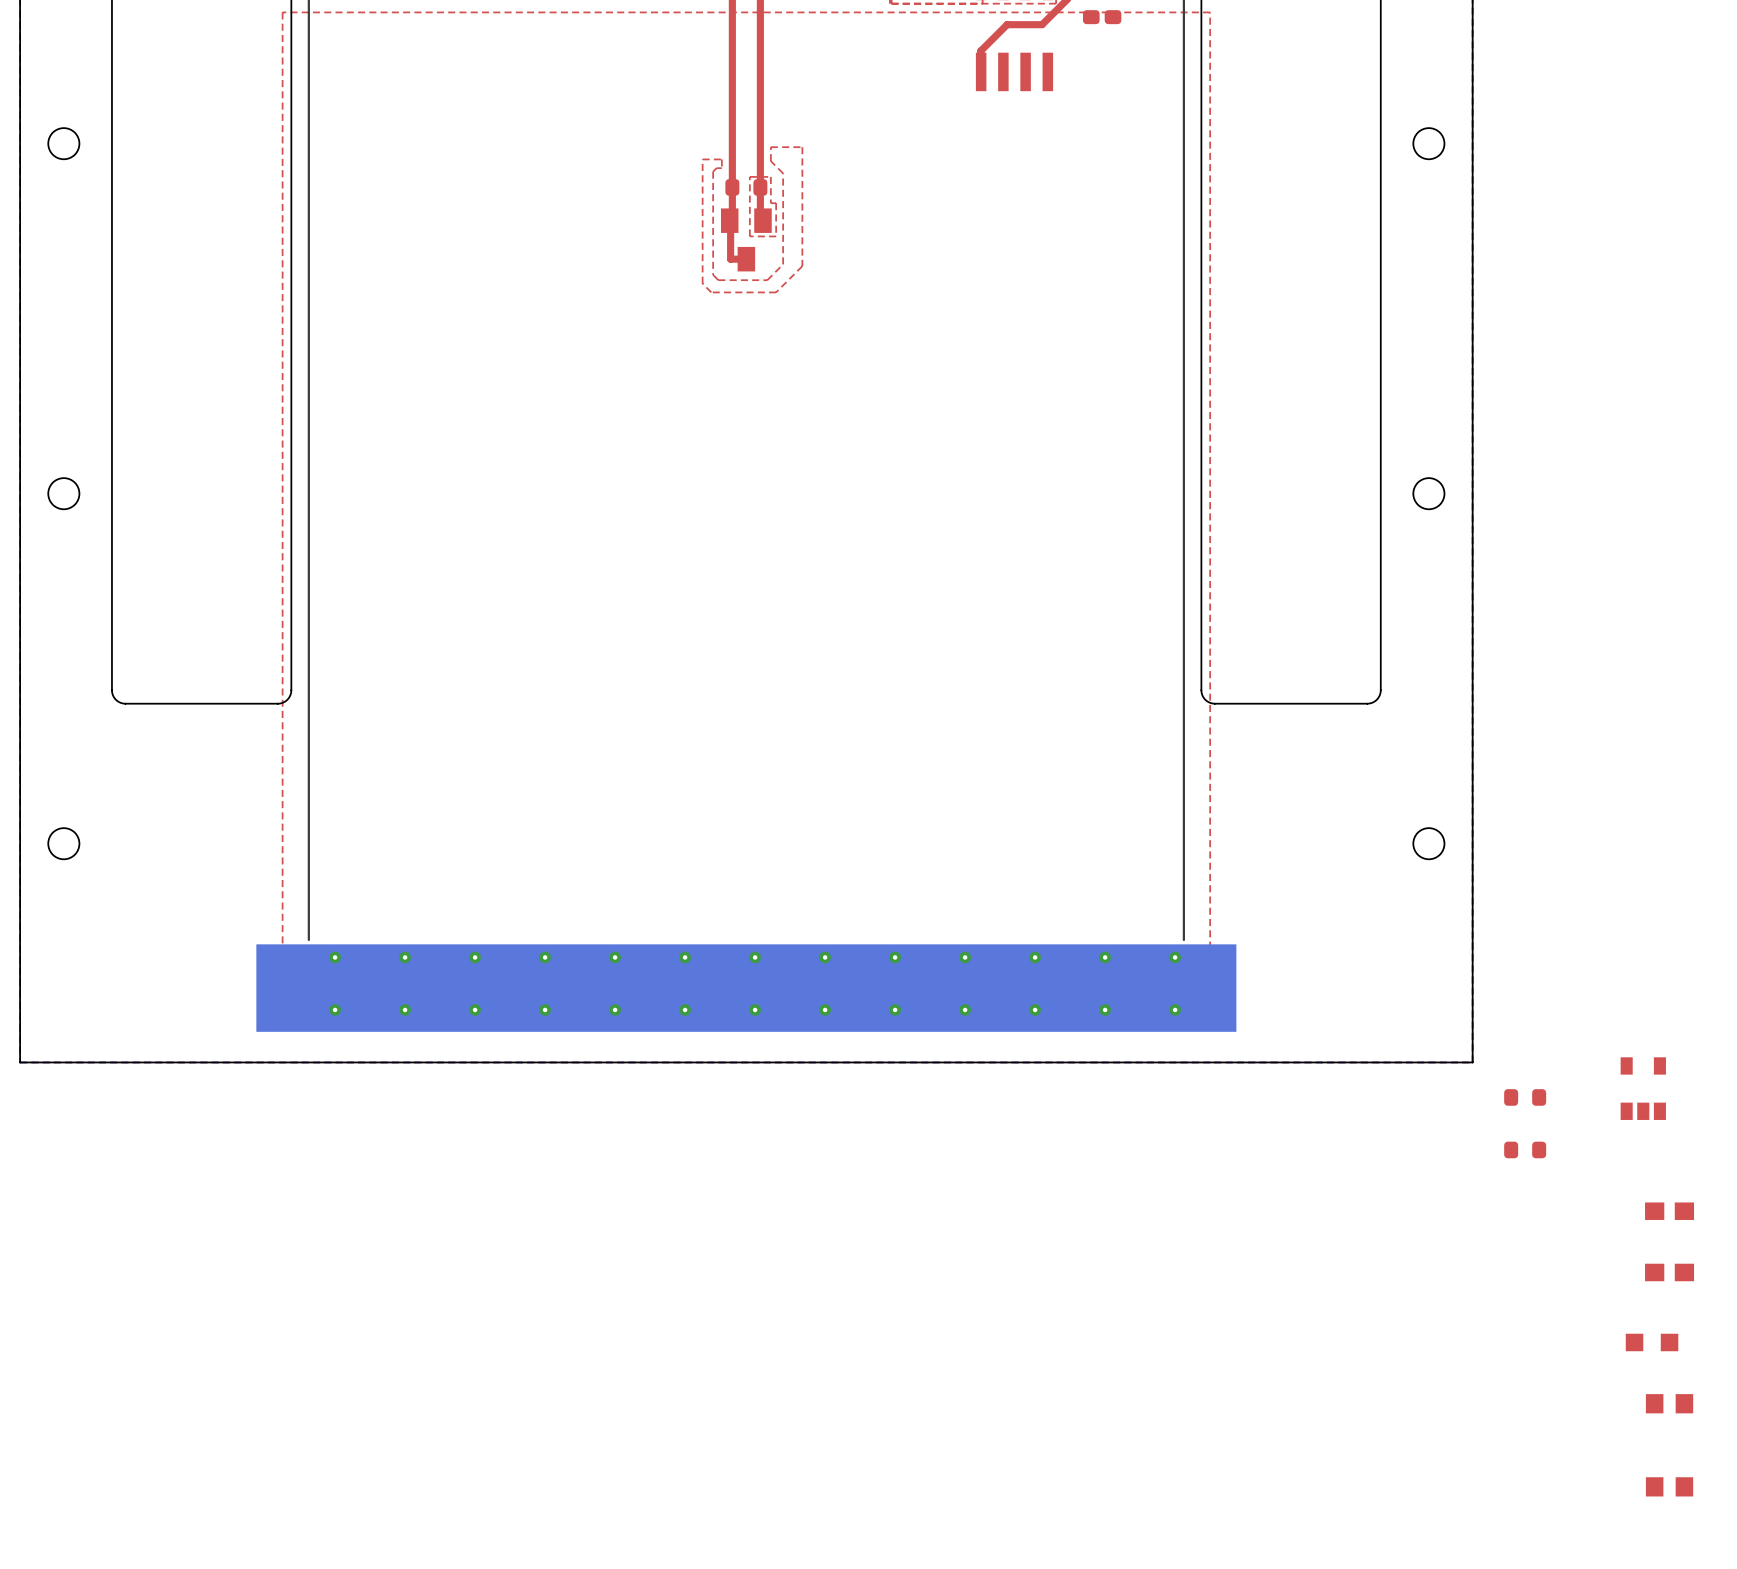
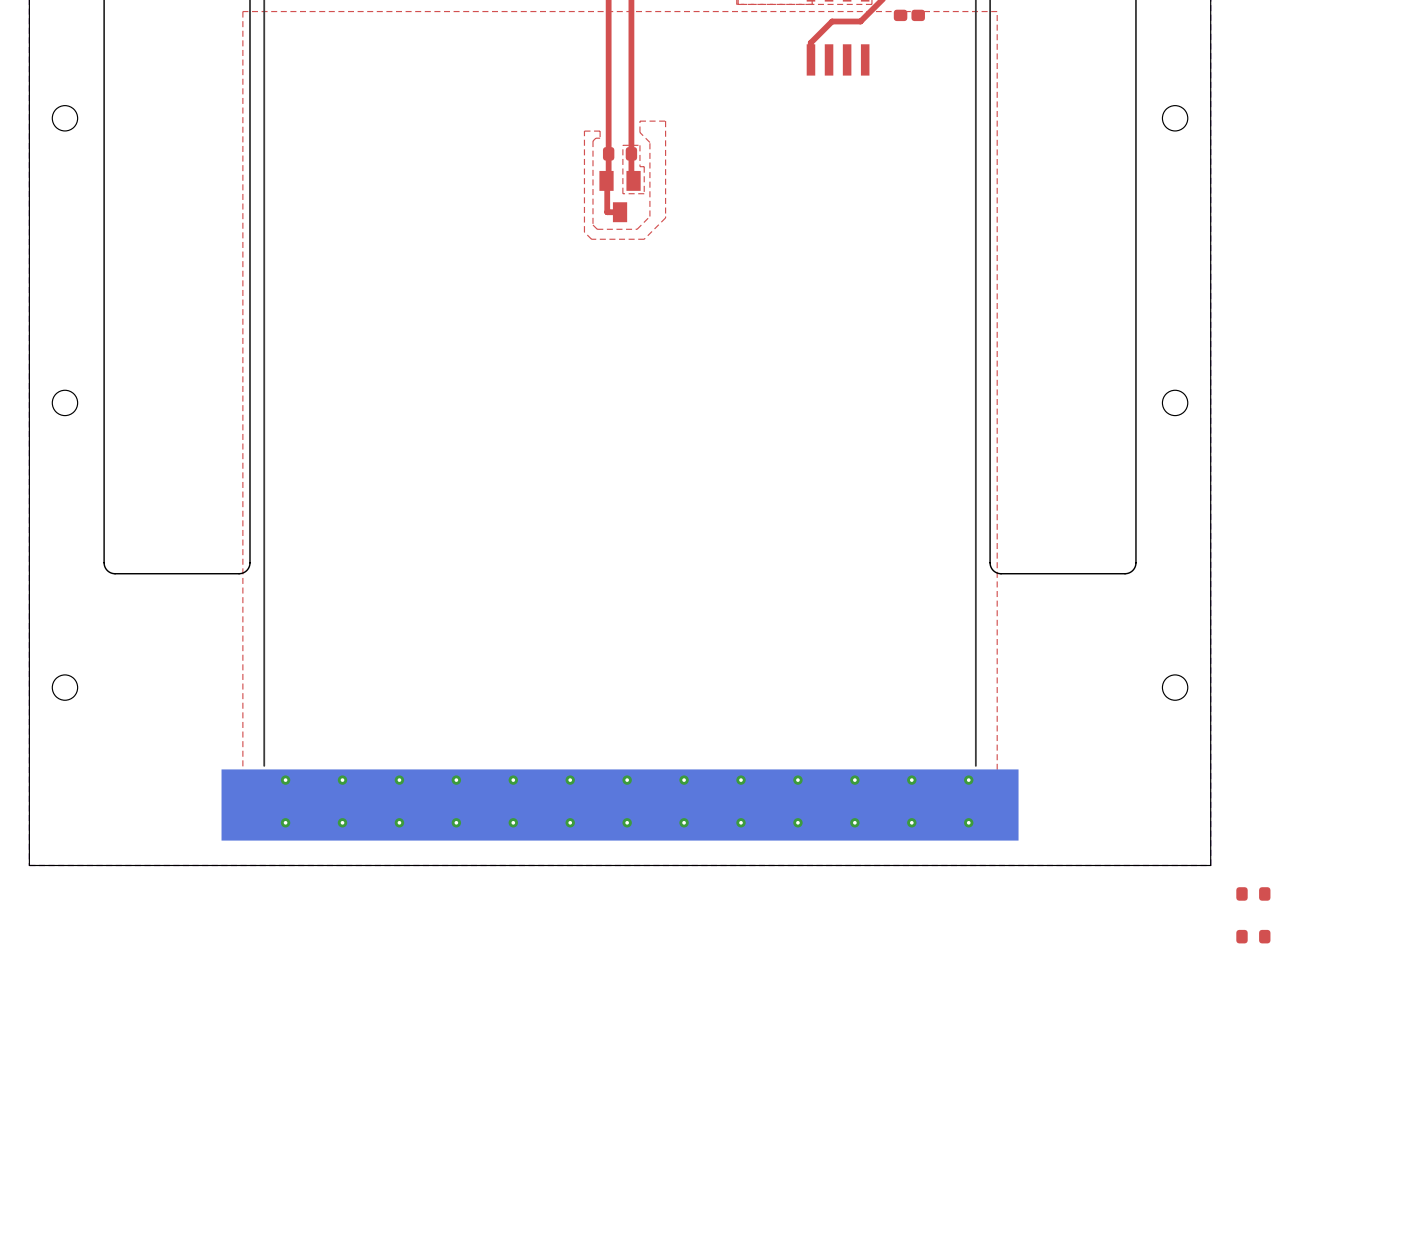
part: (1643, 1088) -> none
part: (1669, 1211) -> none
part: (1669, 1272) -> none
part: (1652, 1342) -> none
part: (1669, 1403) -> none
part: (1669, 1486) -> none

